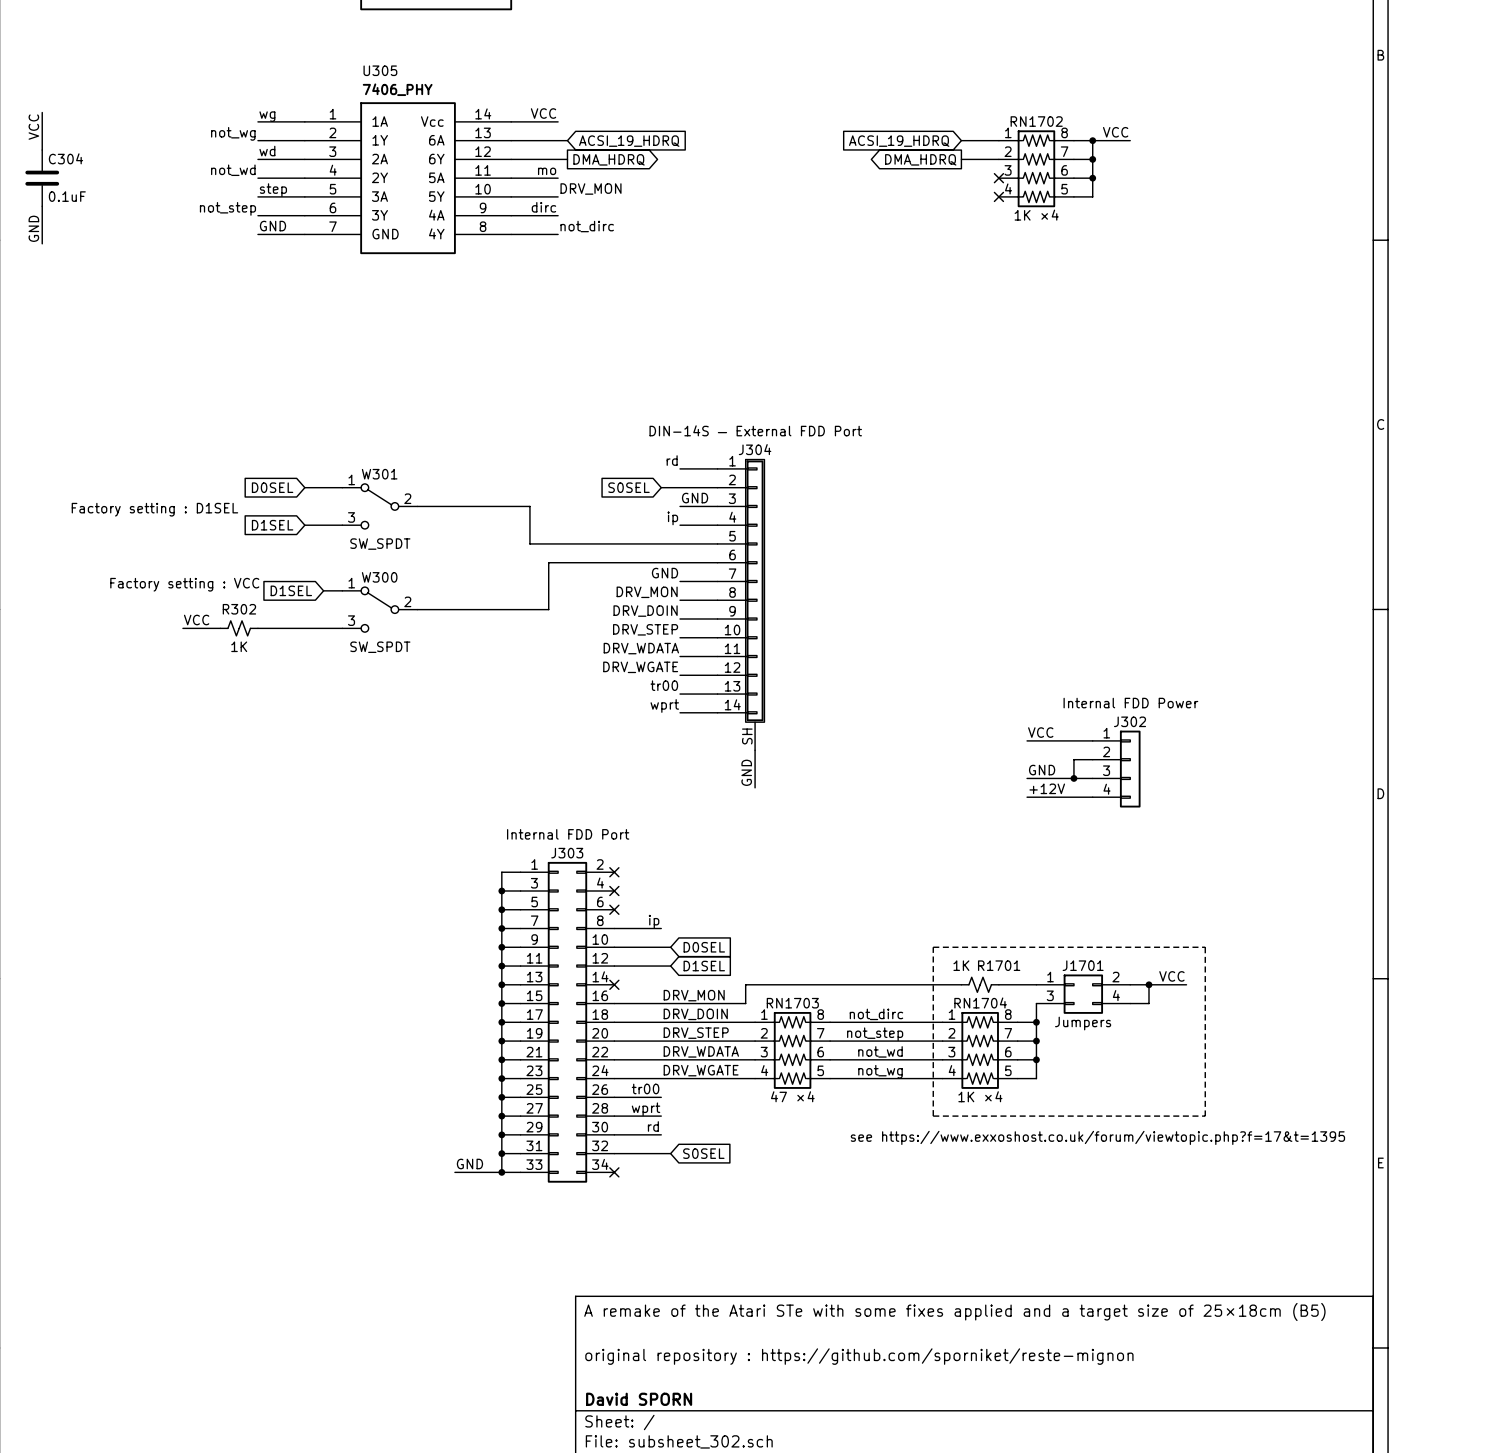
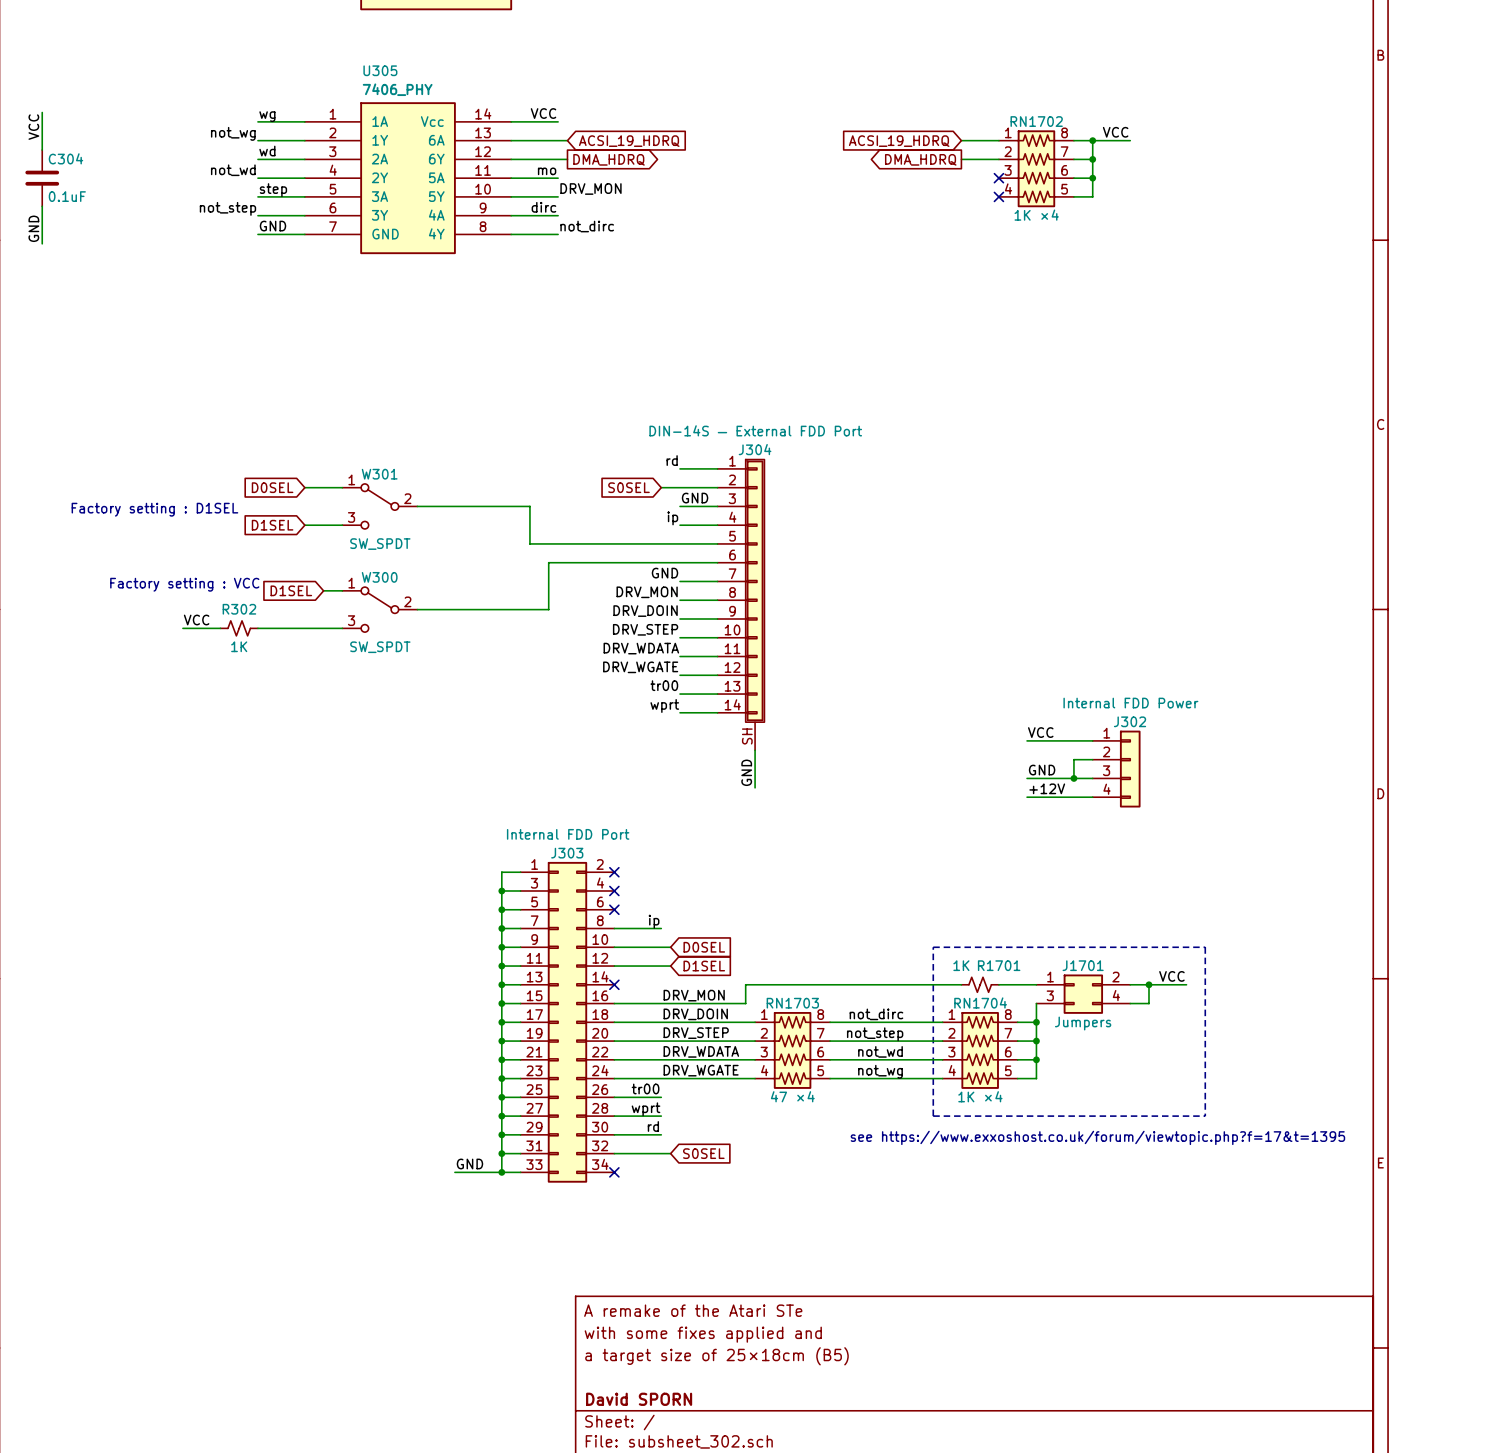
title block: A remake of the Atari STe with some fixes applied and a target size of 25×18cm (B5) (954, 1311) -> A remake of the Atari STe (693, 1310)
title block: none -> with some fixes applied and (703, 1334)
title block: original repository : https://github.com/sporniket/reste-mignon (859, 1356) -> a target size of 25×18cm (B5) (716, 1356)

